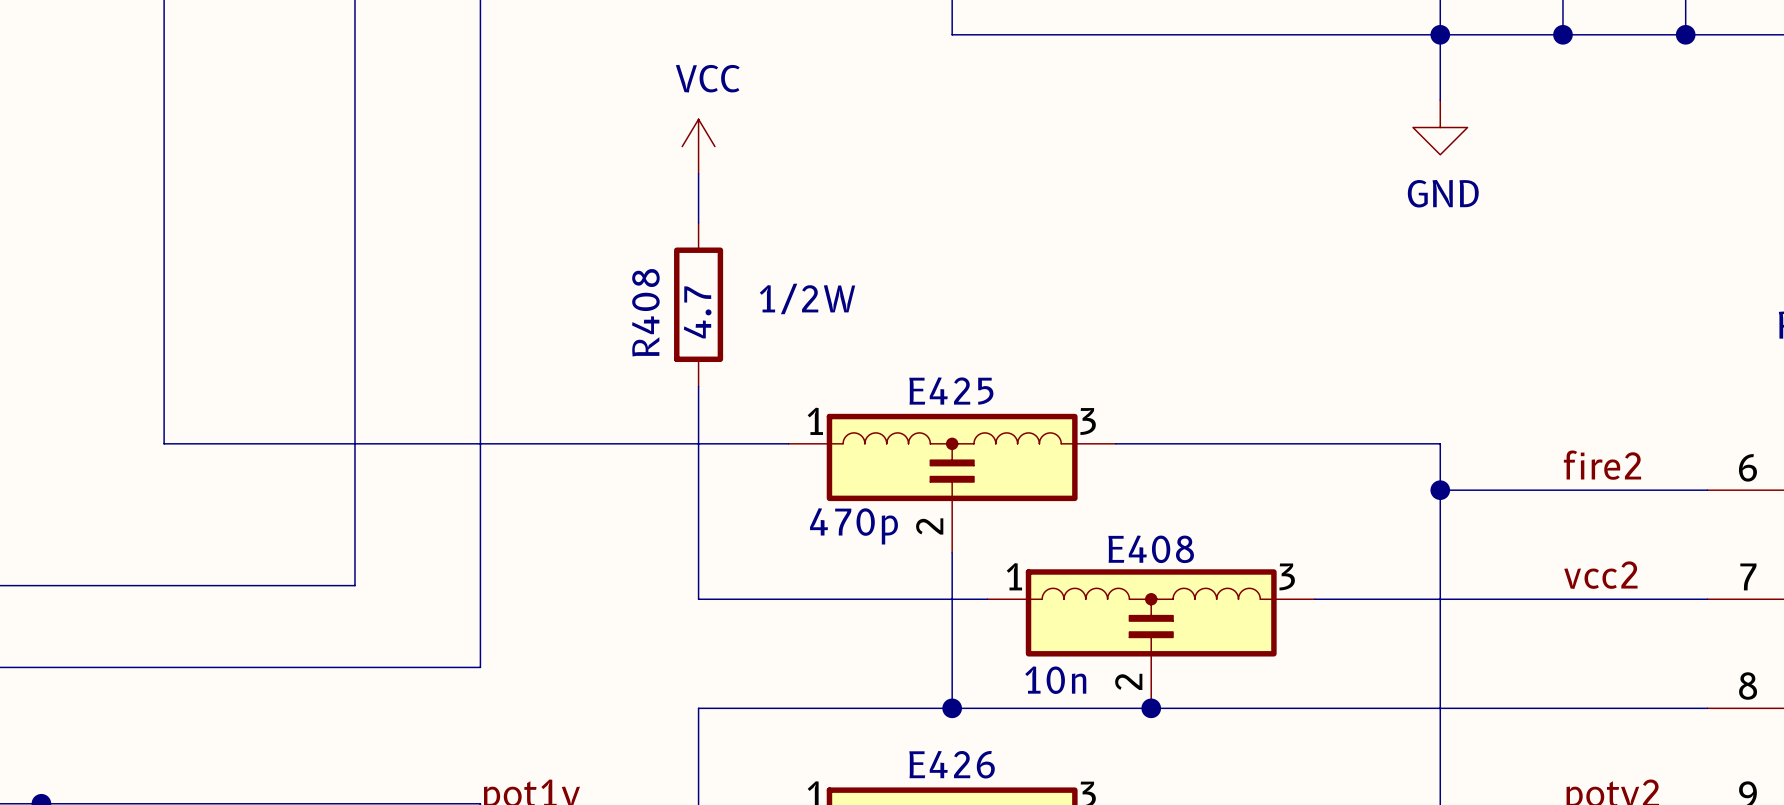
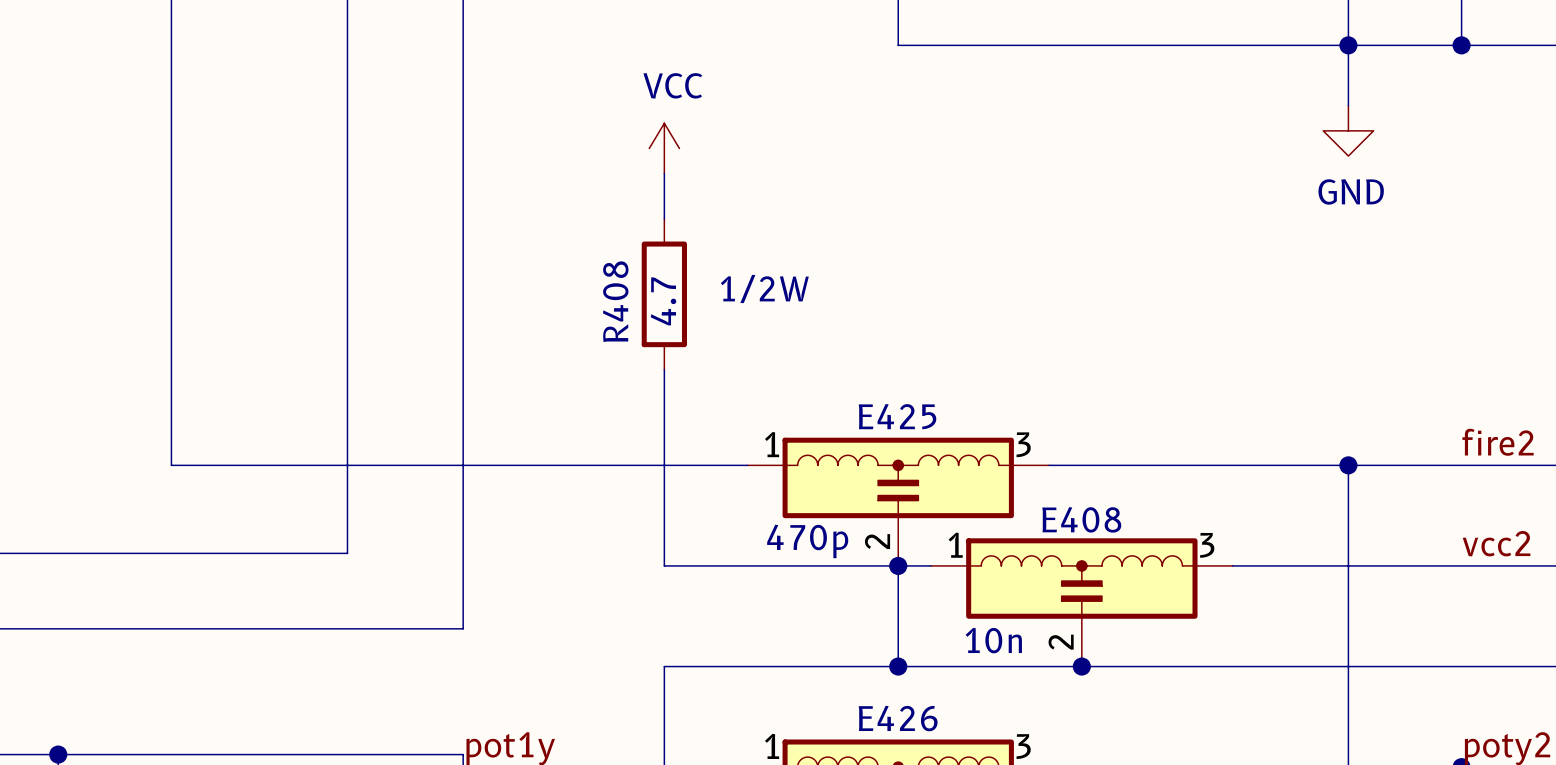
wire: (164, 443) (788, 443) -> (171, 422) (171, 465) (747, 465)
wire: (1115, 443) (1440, 443) (1440, 490) -> (1049, 465) (1348, 465)
E425 position: (952, 483) -> (898, 501)
junction: none -> (898, 565)

